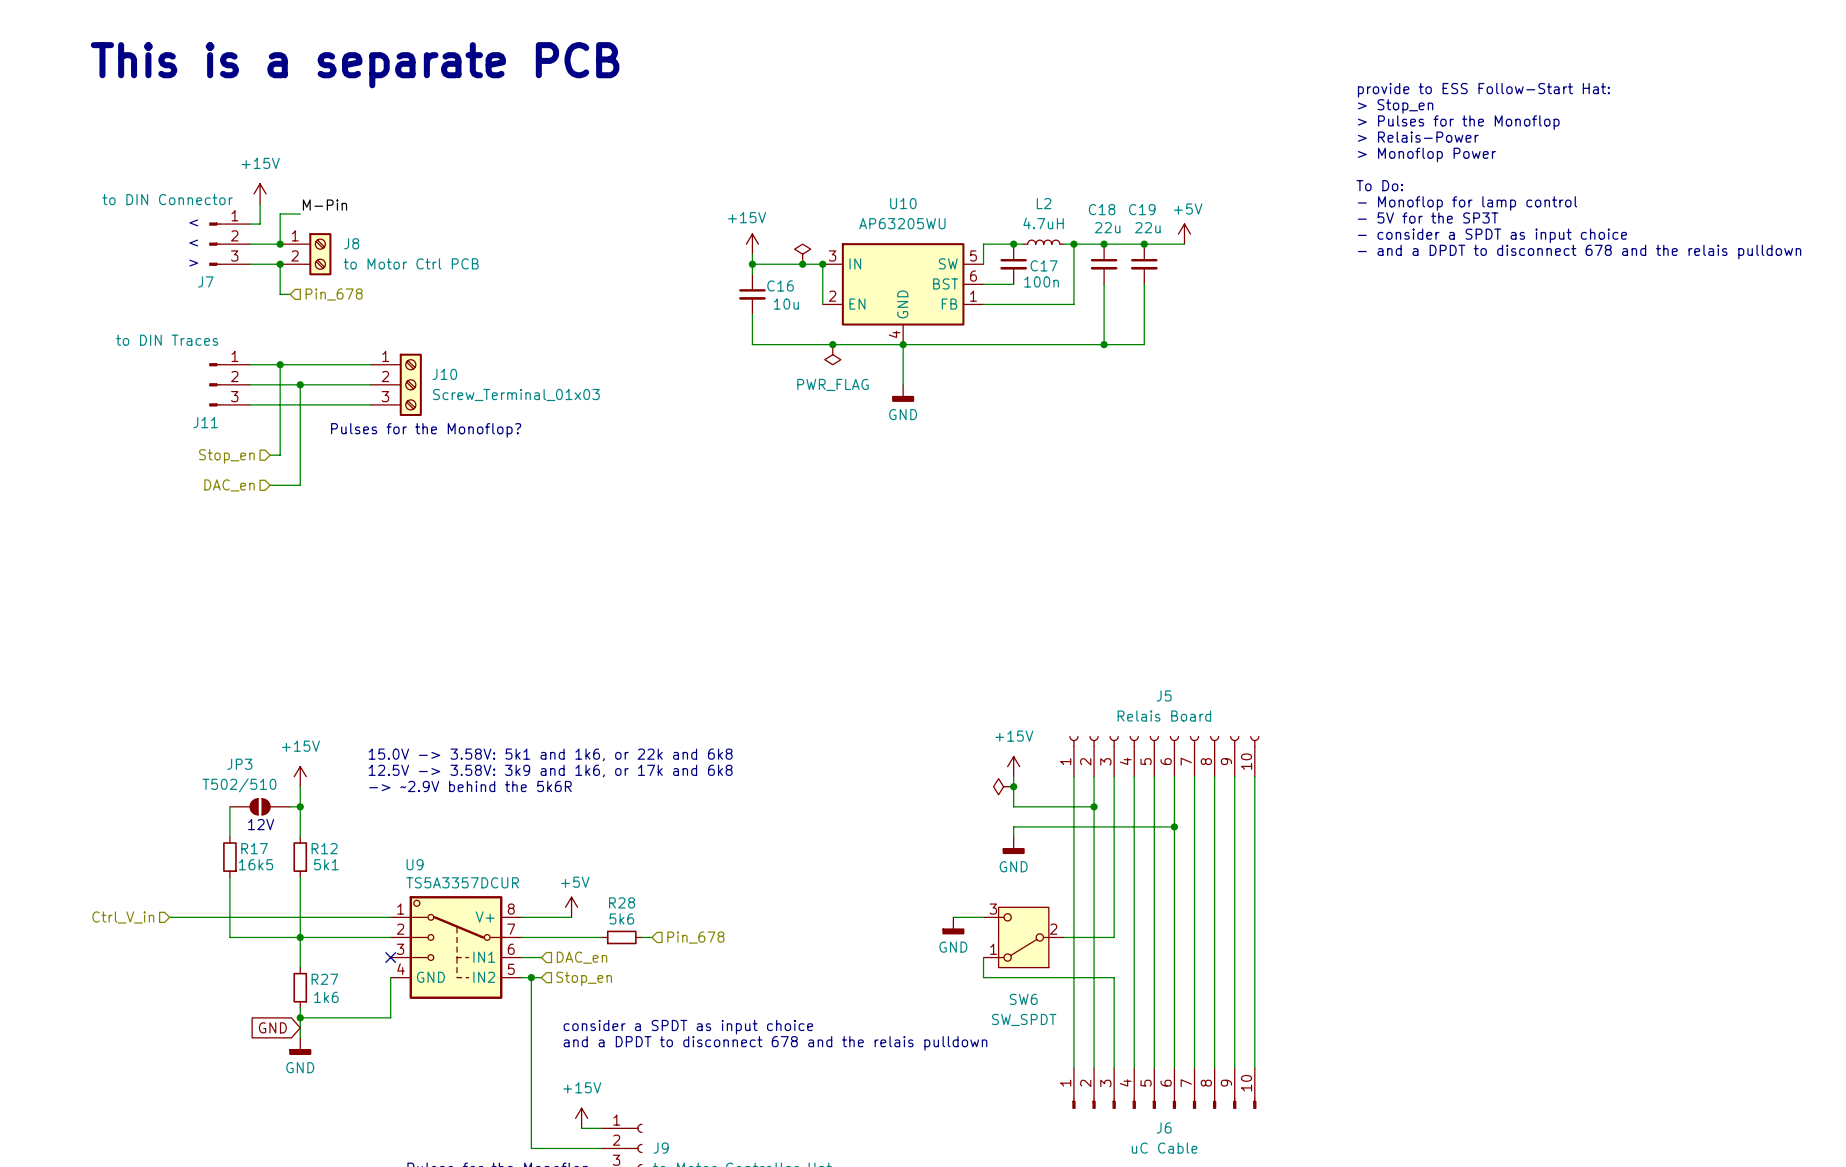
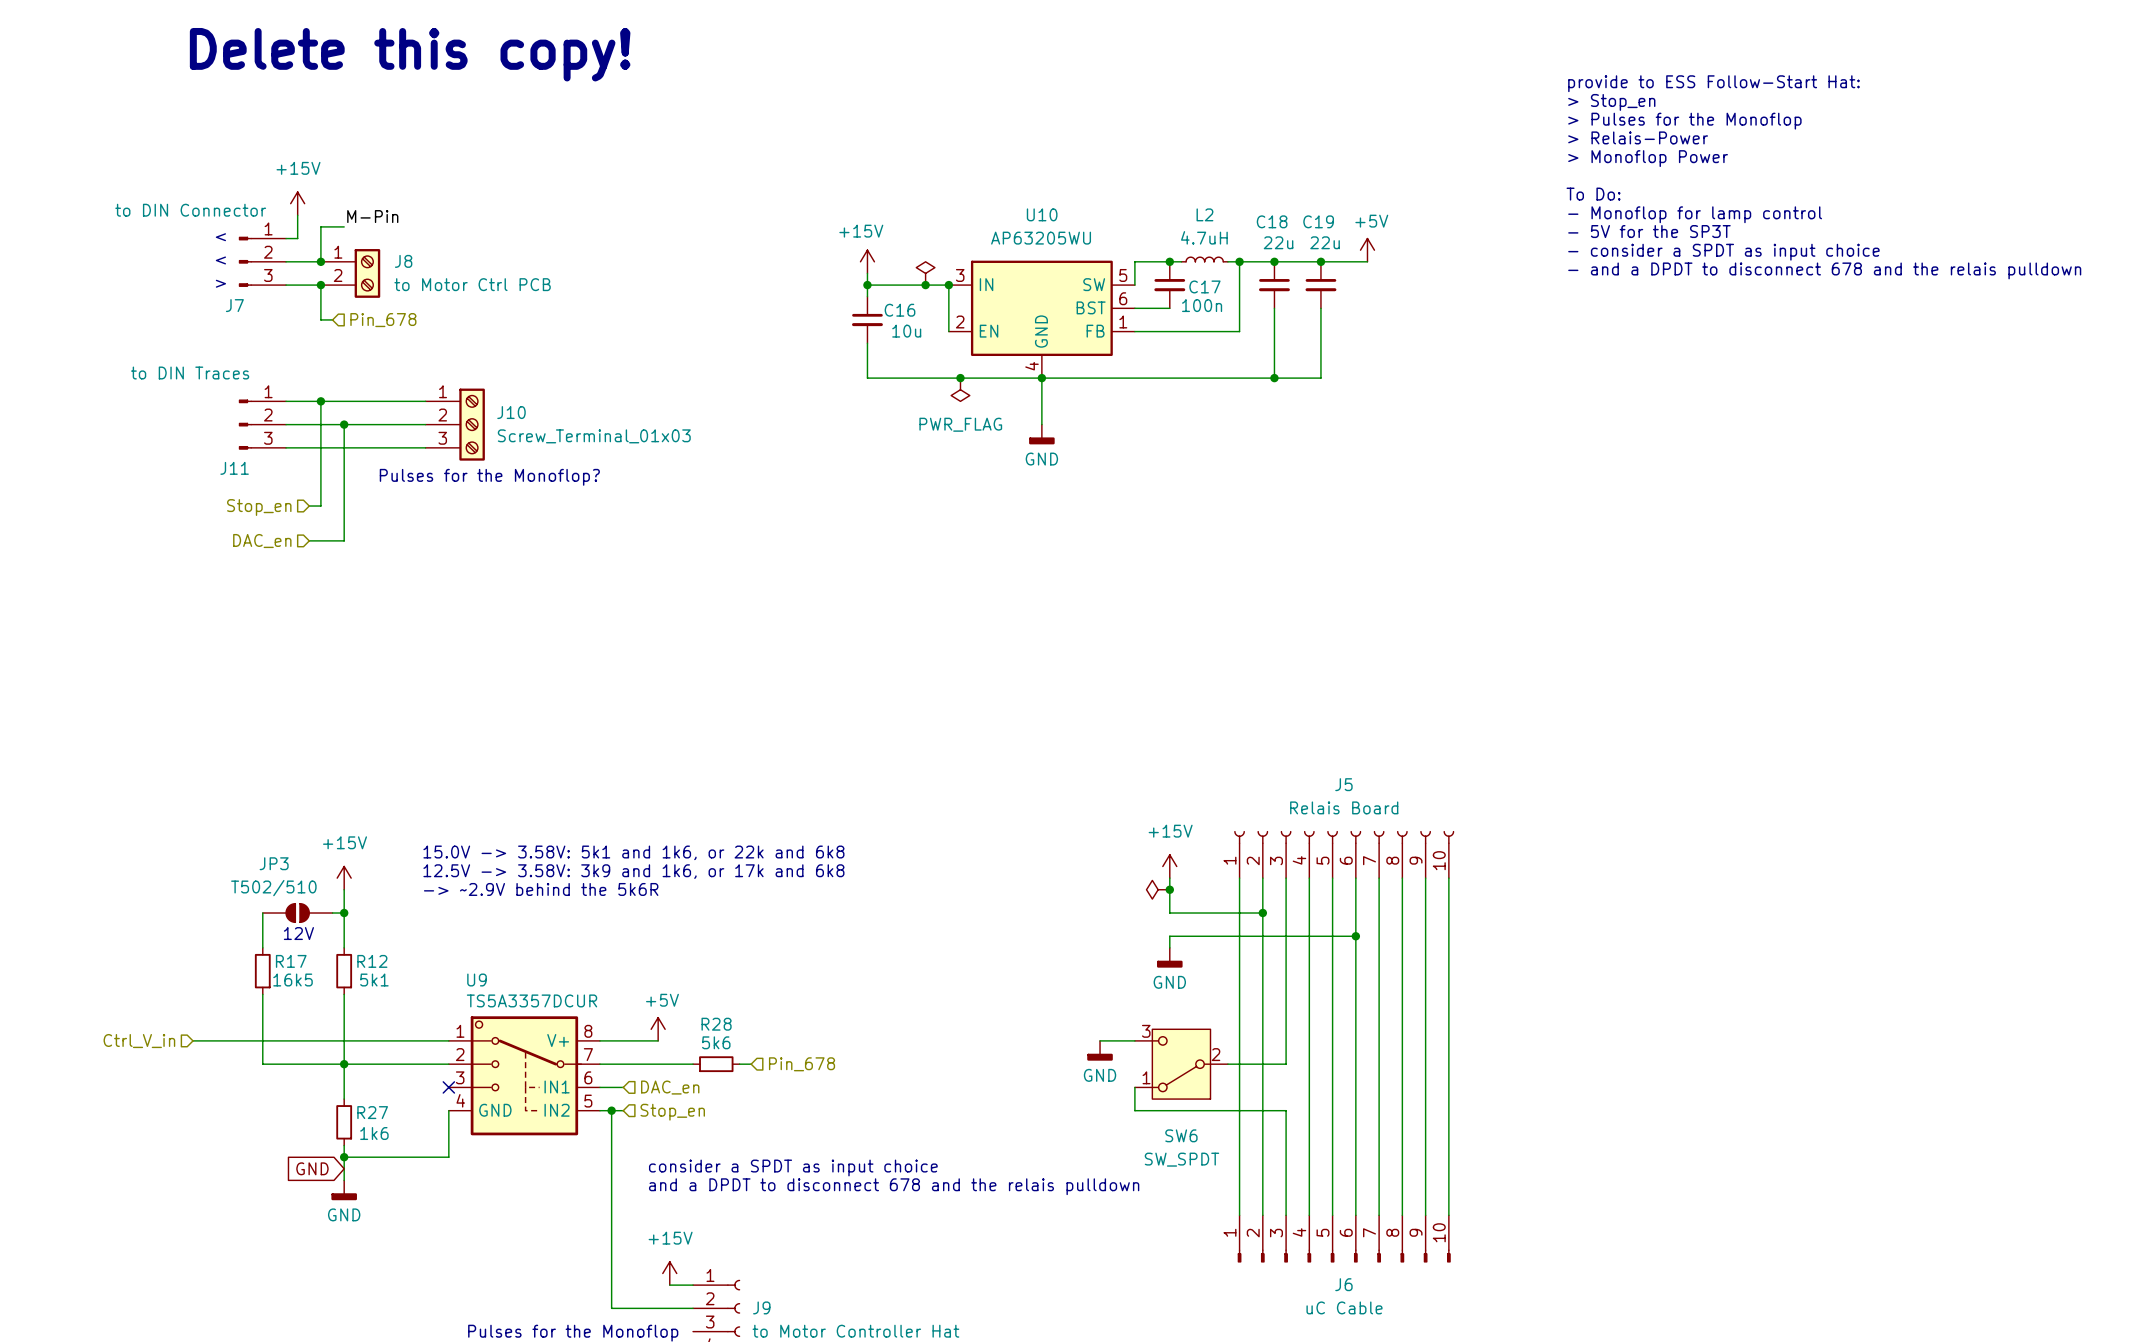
text: This is a separate PCB (355, 65) -> Delete this copy! (410, 54)

